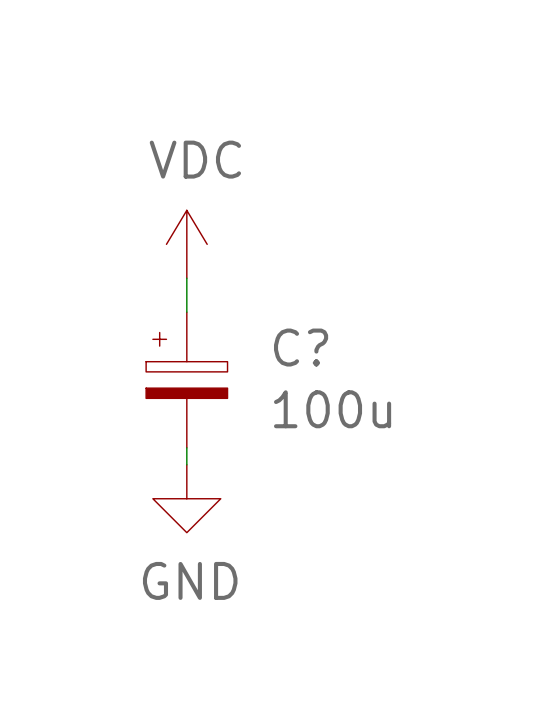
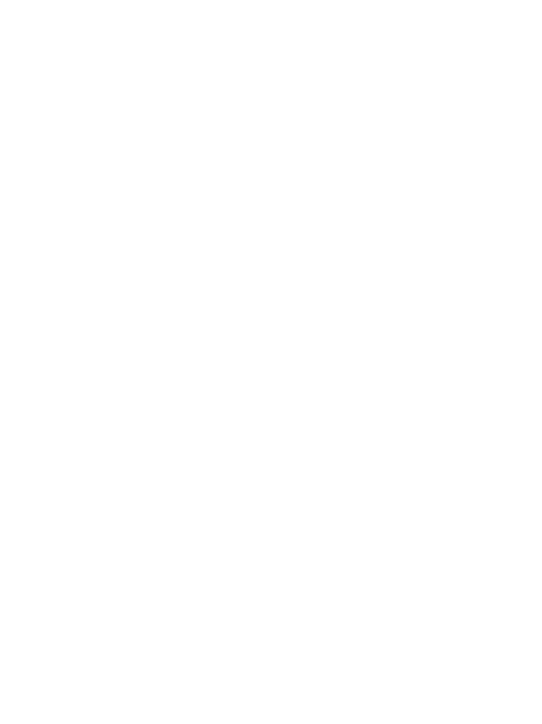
power symbol: VDC (186, 244) -> none
wire: (186, 278) (186, 312) -> none
C?: 100u (186, 380) -> none
wire: (186, 447) (186, 464) -> none
power symbol: GND (186, 498) -> none

